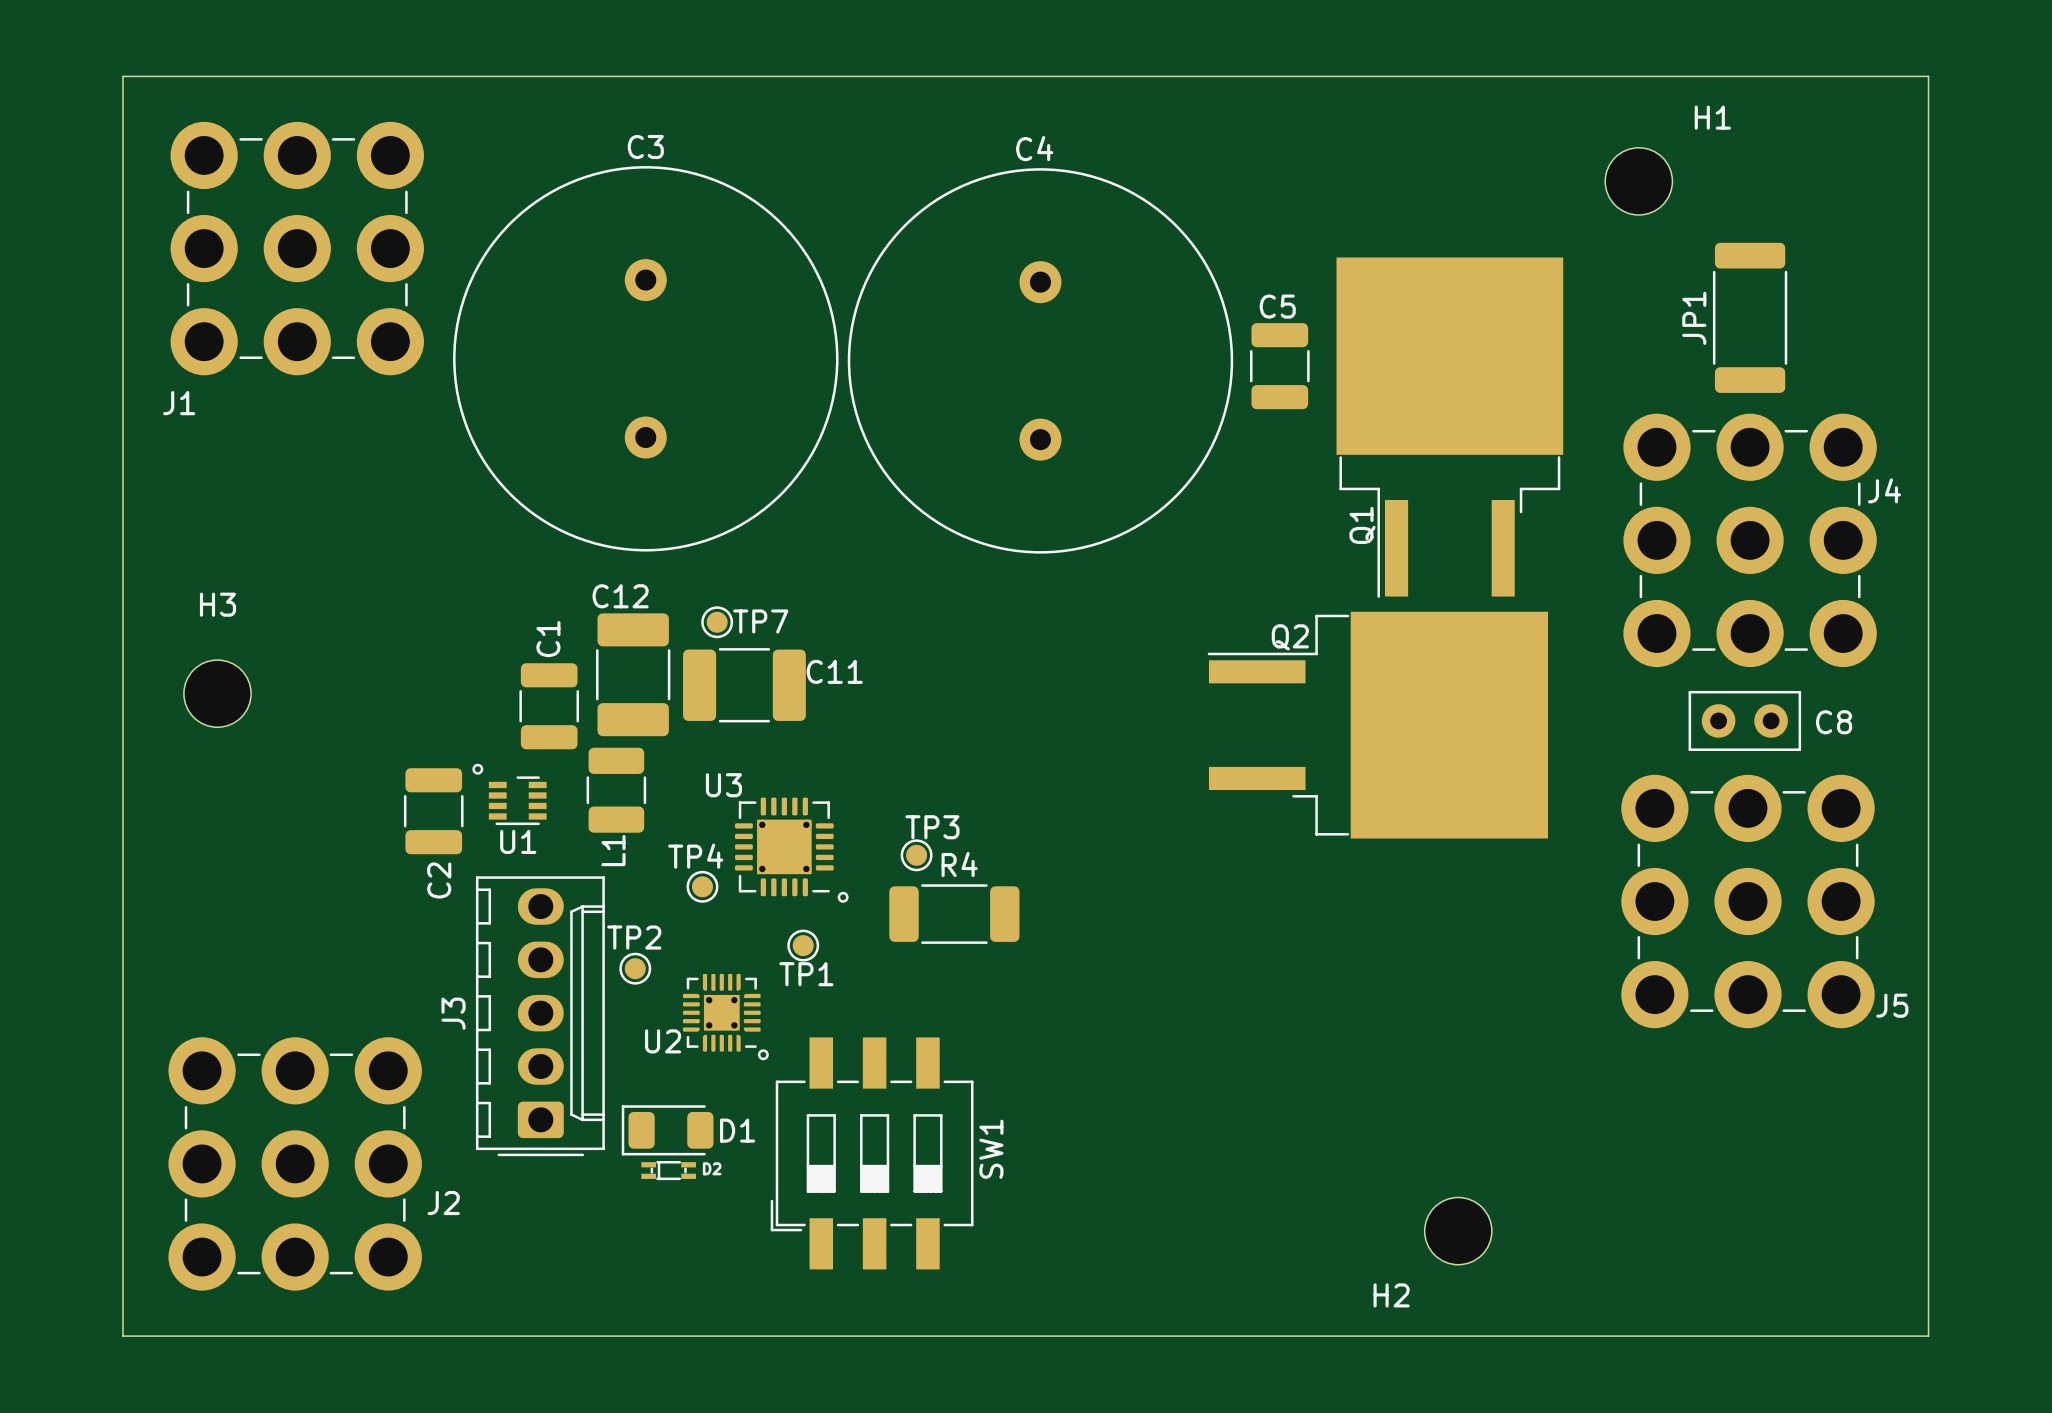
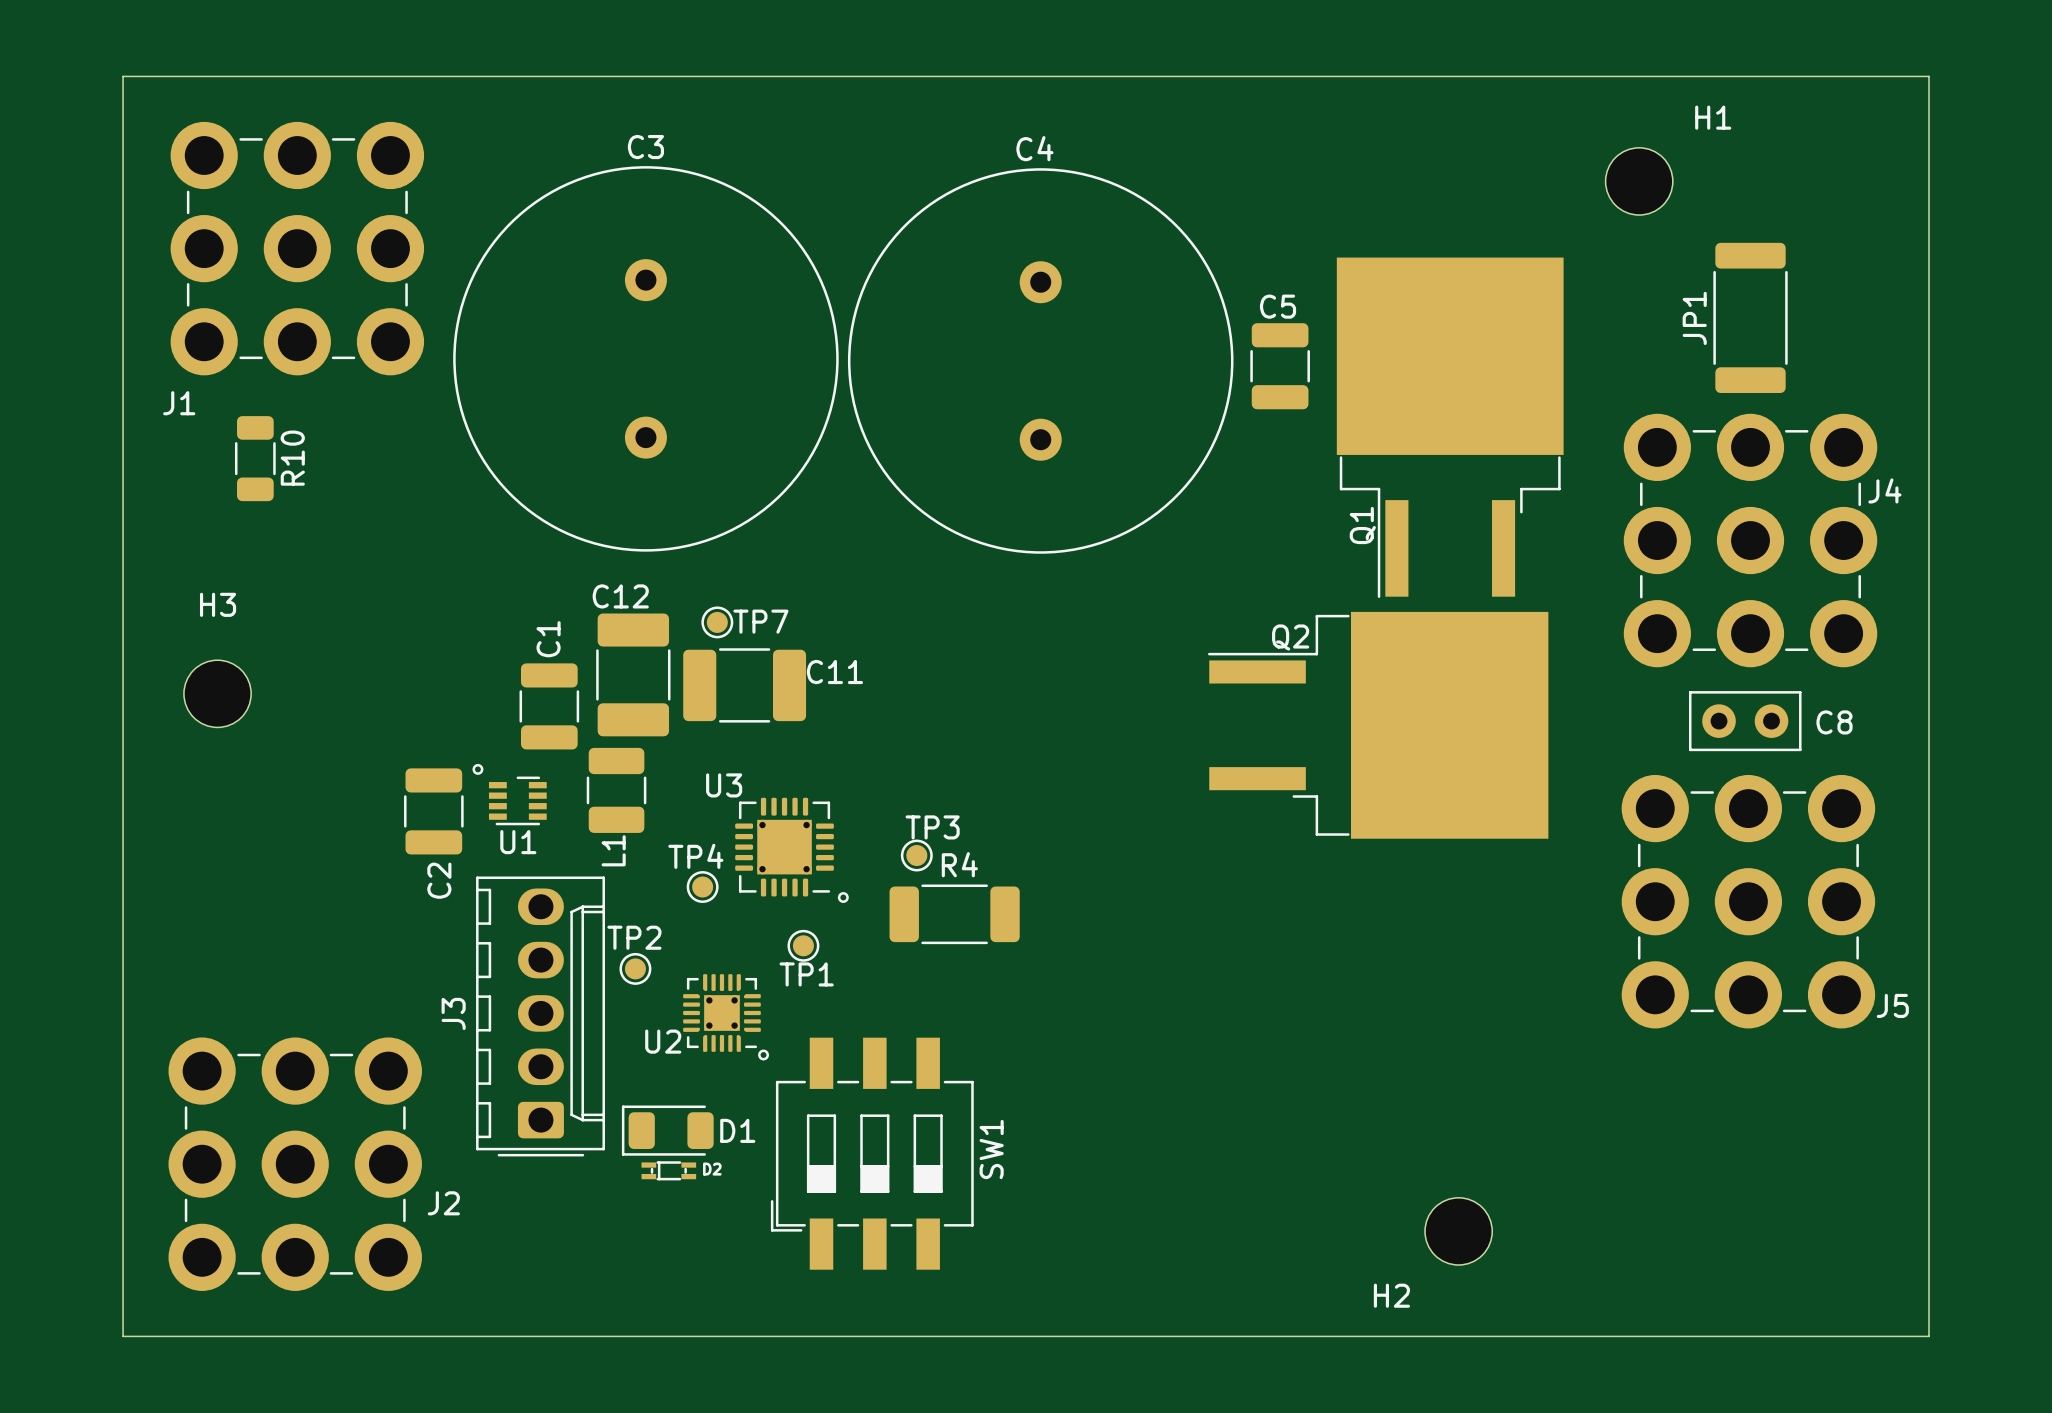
R10: none -> (255, 458)

